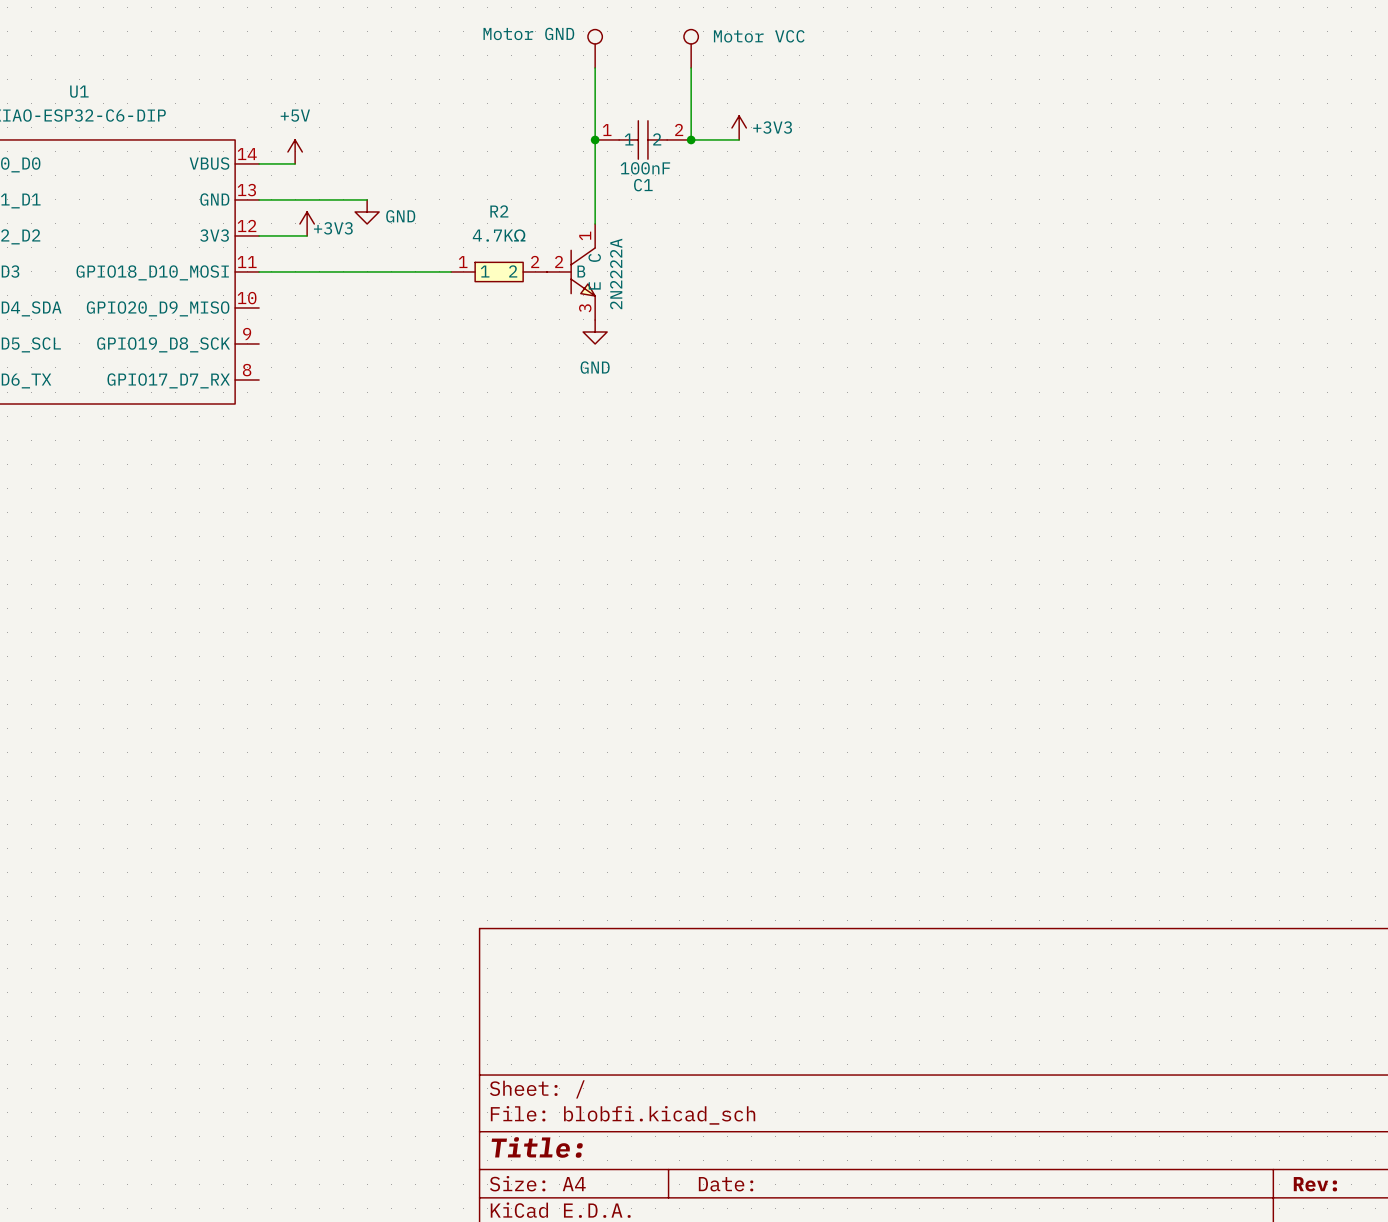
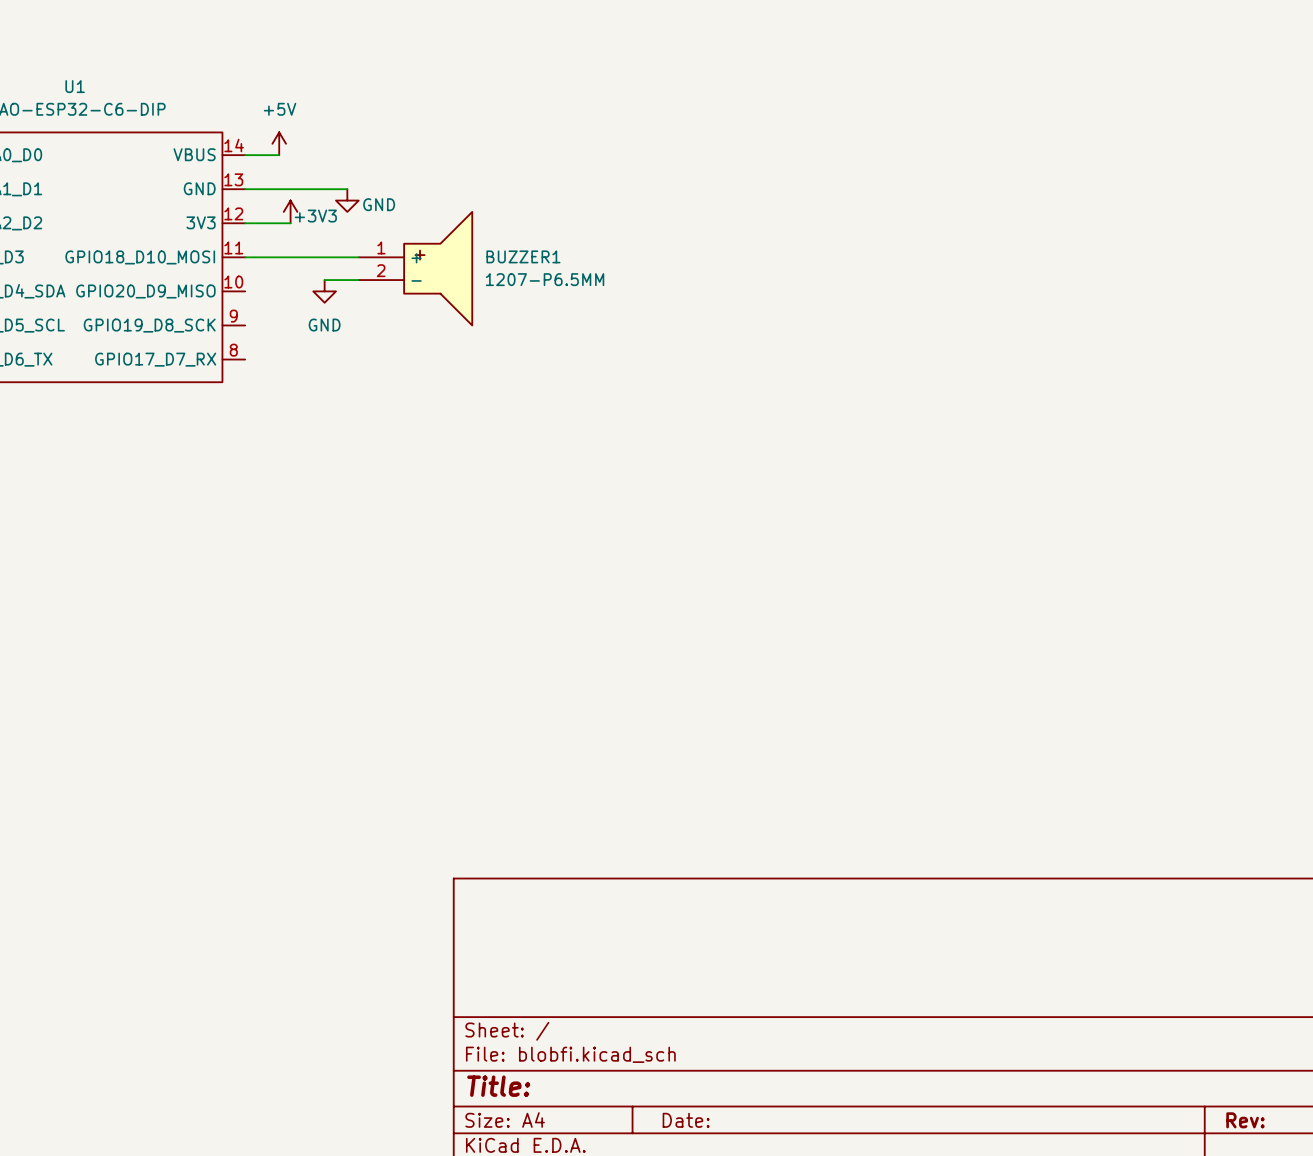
part: Motor GND (595, 48) -> none
part: Motor VCC (691, 48) -> none
wire: (595, 67) (595, 223) -> none
wire: (691, 67) (691, 139) (739, 139) -> none
power symbol: +3V3 (739, 127) -> none
junction: (595, 139) -> none
C1: 100nF (643, 139) -> none
junction: (691, 139) -> none
R2: 4.7KΩ (499, 271) -> none
part: 2N2222A (571, 271) -> none
BUZZER1: none -> 1207-P6.5MM (415, 268)
wire: none -> (324, 280) (358, 280)
power symbol: none -> GND (324, 291)
power symbol: GND (595, 331) -> none

